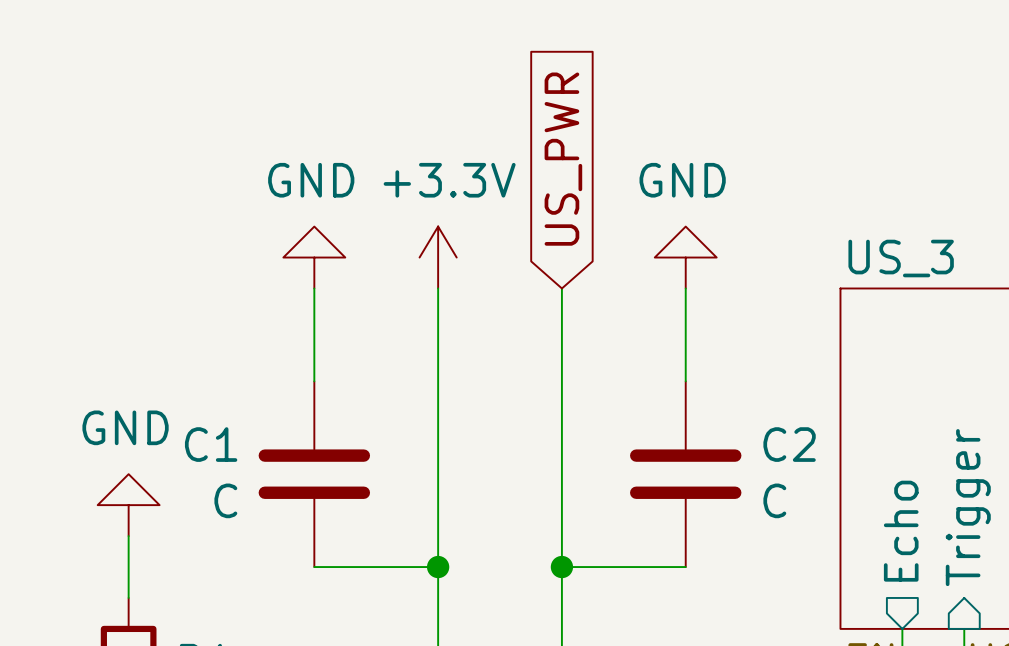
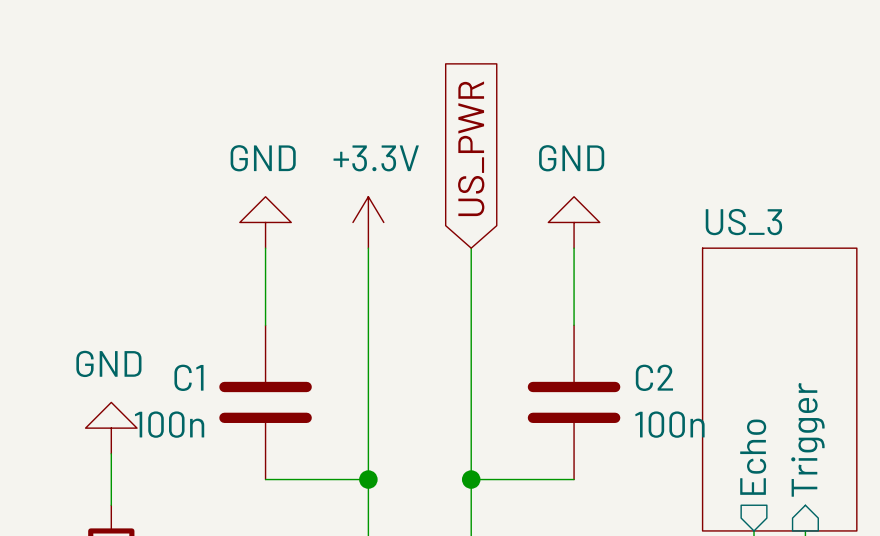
C1 value: C (225, 500) -> 100n (169, 424)
C2 value: C (774, 500) -> 100n (669, 424)

